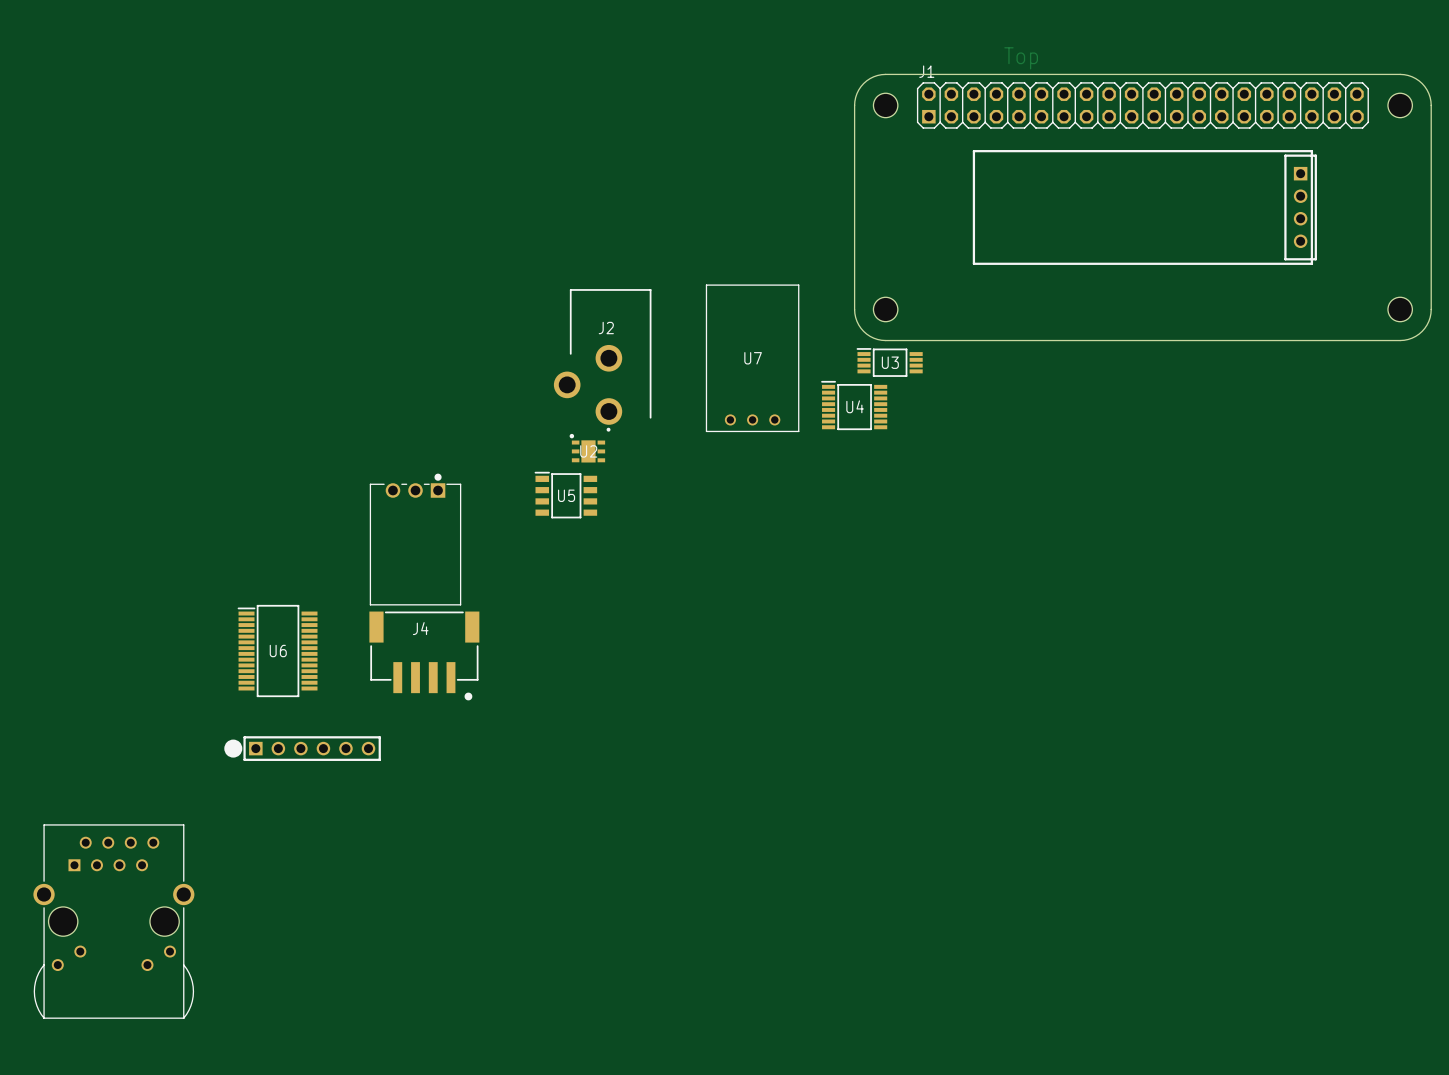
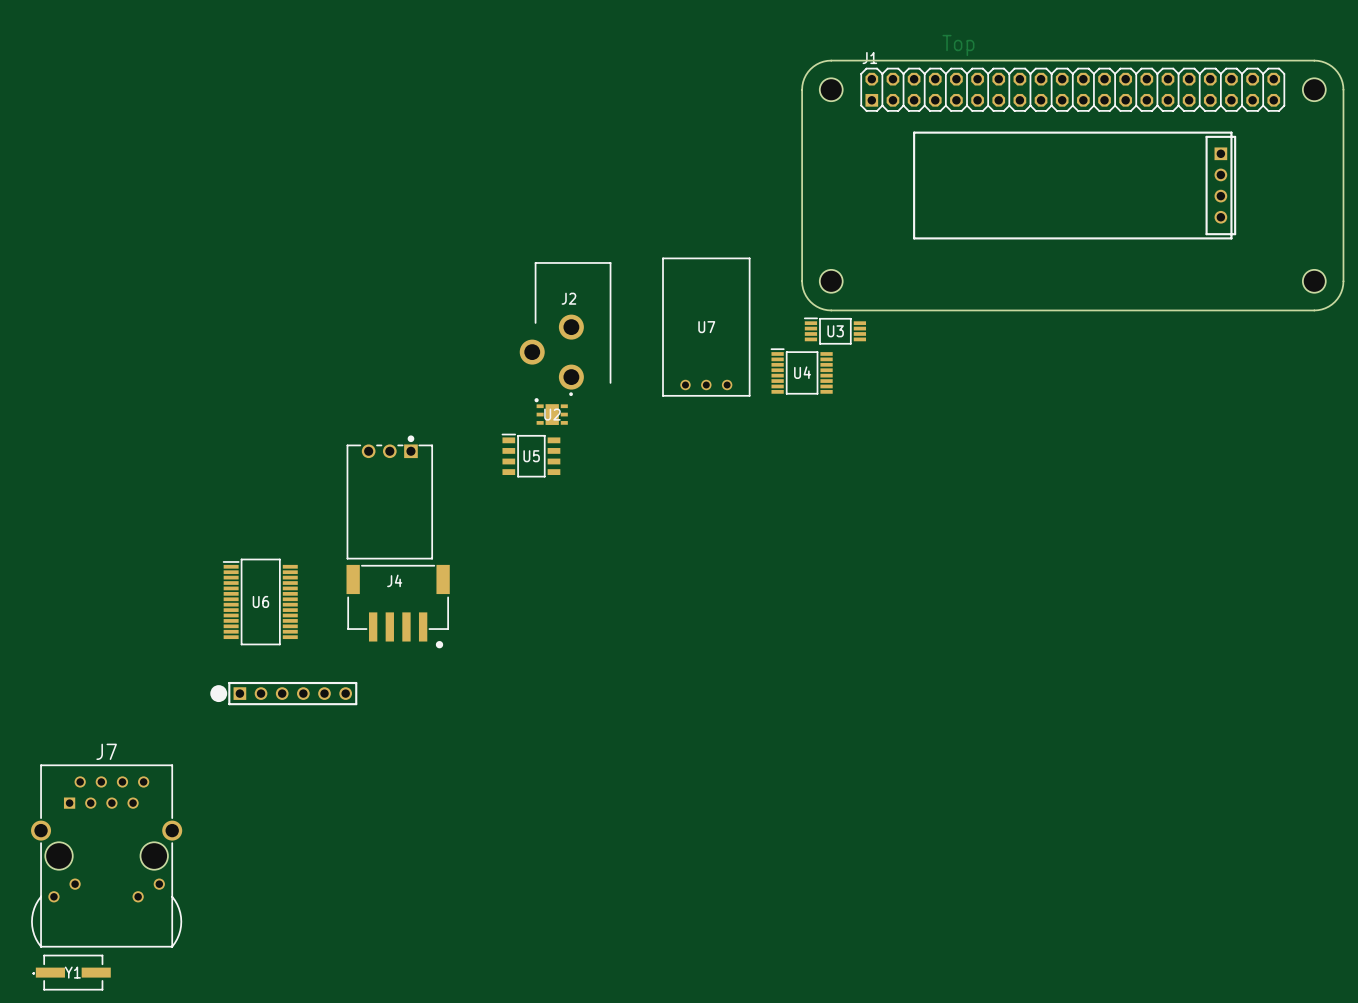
J7 name: none -> J7 (106, 751)
Y1: none -> (71, 972)

